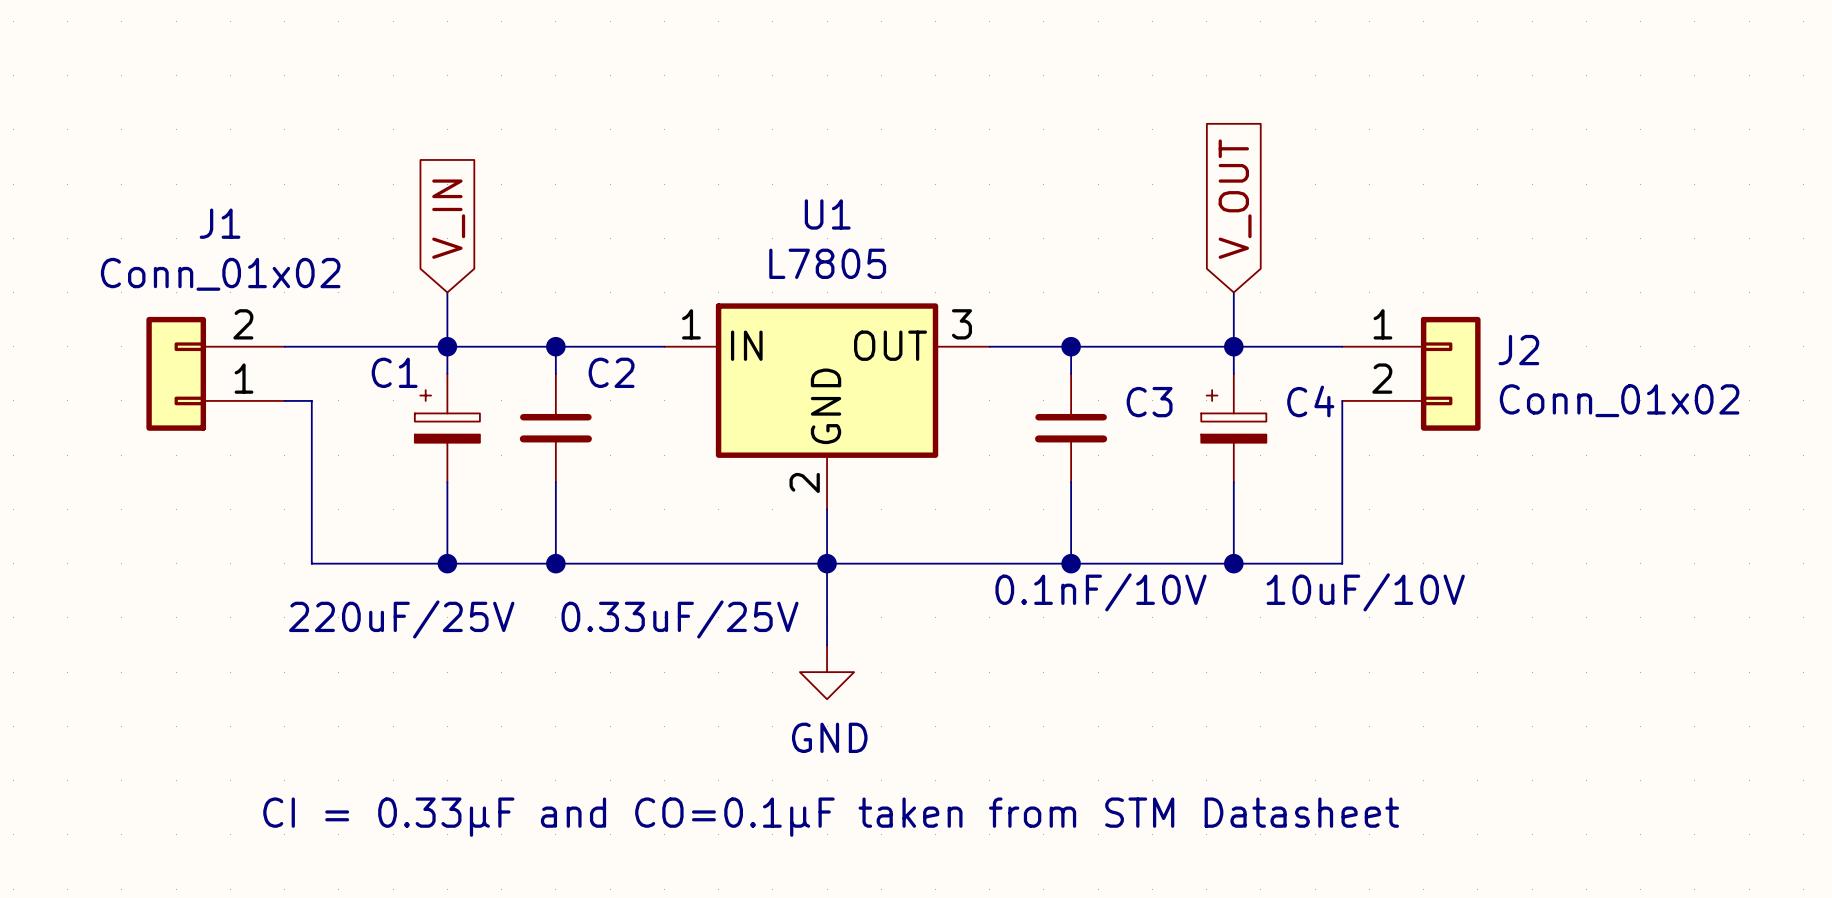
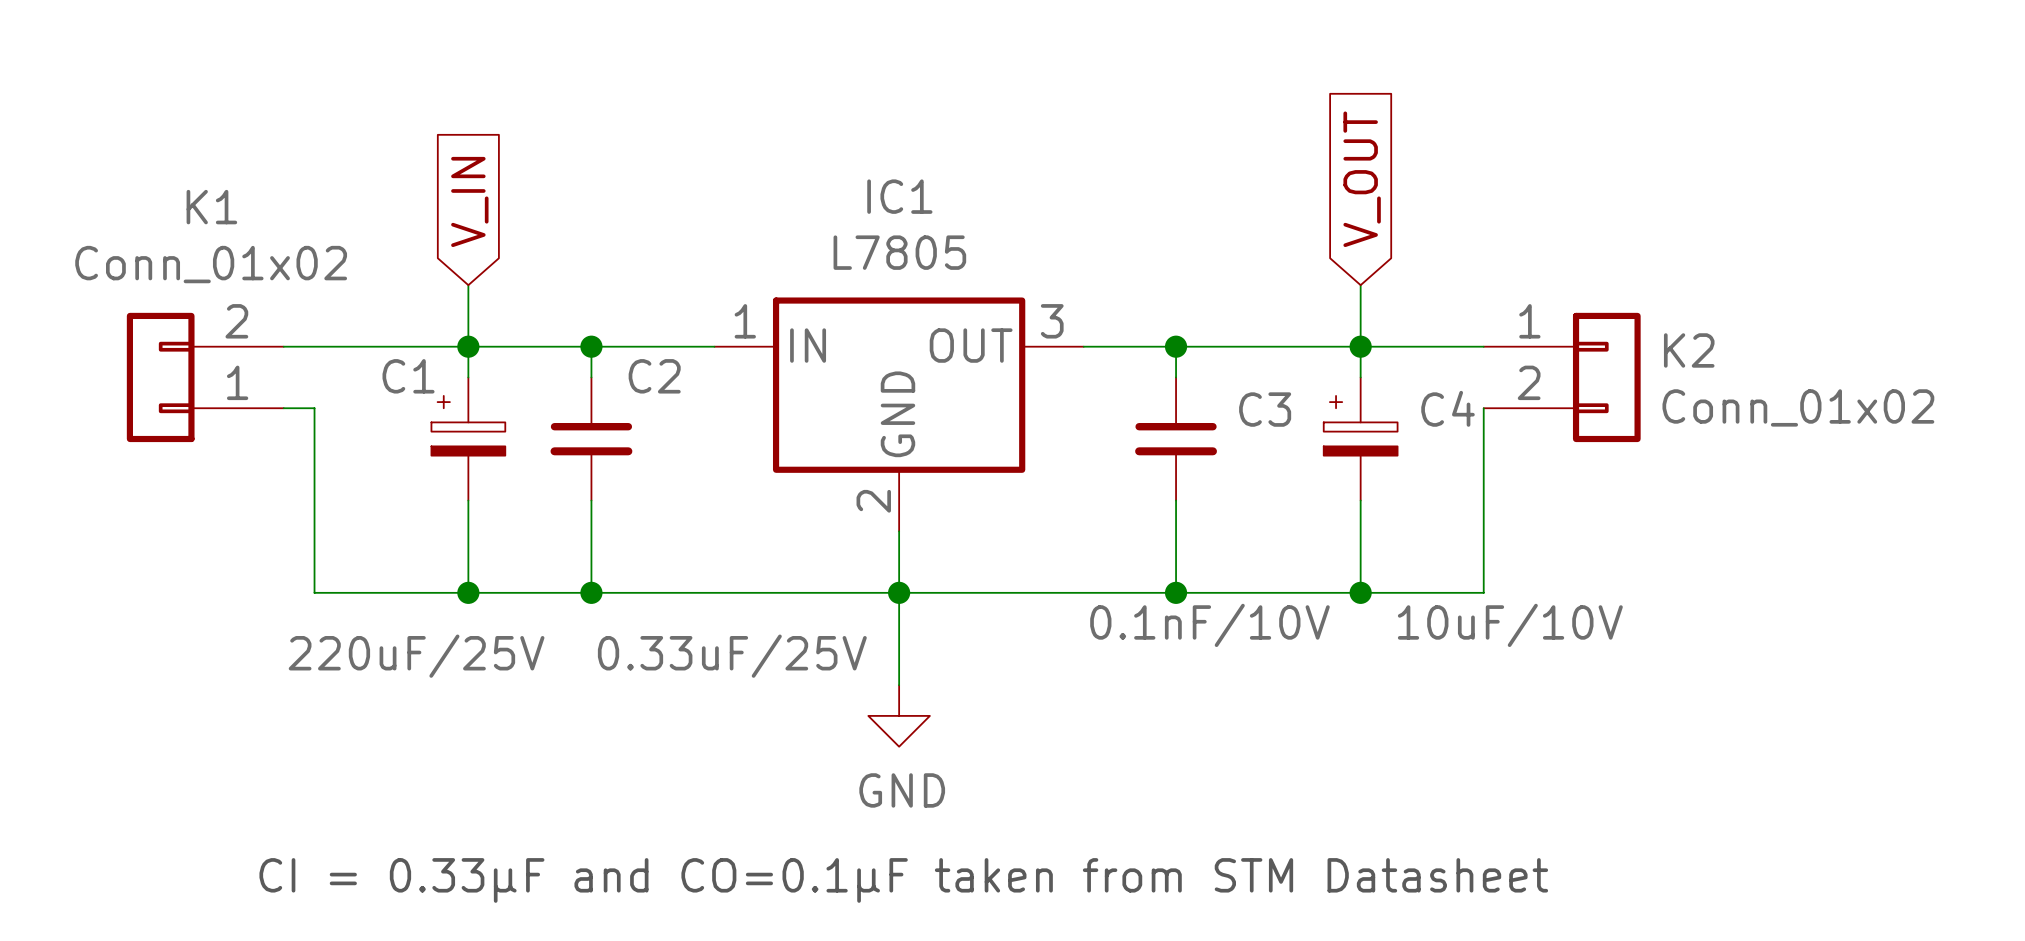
U1 name: U1 (827, 214) -> IC1 (899, 196)
J1 name: J1 (220, 223) -> K1 (211, 207)
J2 name: J2 (1518, 350) -> K2 (1689, 350)

